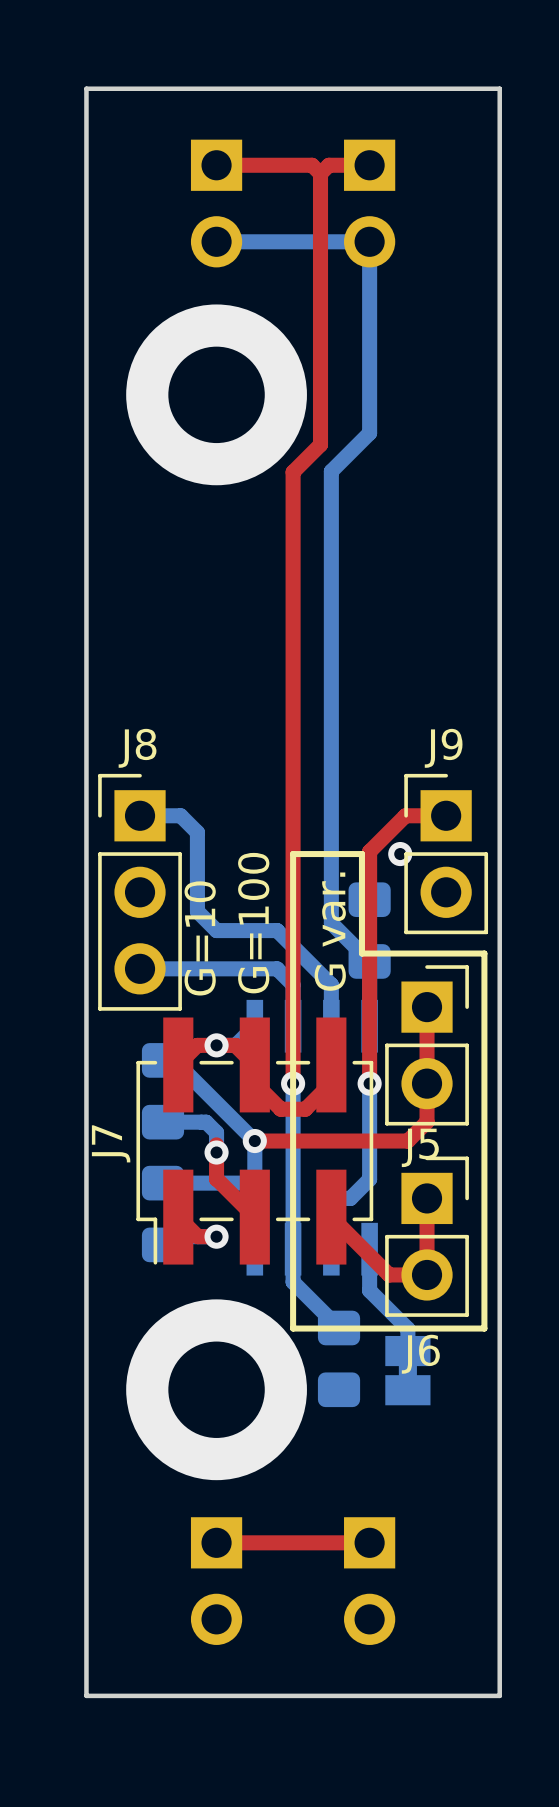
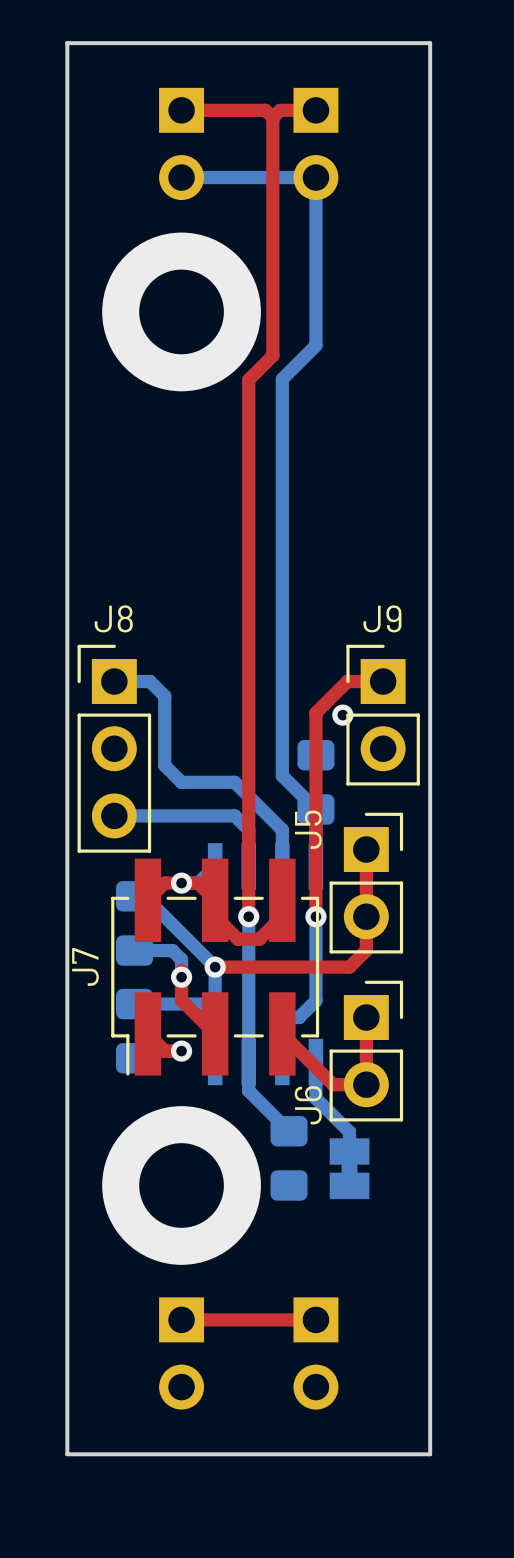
line: (293, 854) (293, 1328) (484, 1328) (484, 953) (361, 953) (361, 854) (293, 854) -> none
text: G=100 (253, 923) -> none
text: G var. (330, 931) -> none
text: G=10 (200, 938) -> none
J5 name rotation: 0° (420, 1147) -> 90° counterclockwise (308, 829)
J5 name position: J5 (420, 1147) -> J5 (308, 829)
J6 name rotation: 0° (420, 1354) -> 90° counterclockwise (308, 1105)
J6 name position: J6 (420, 1354) -> J6 (308, 1105)

